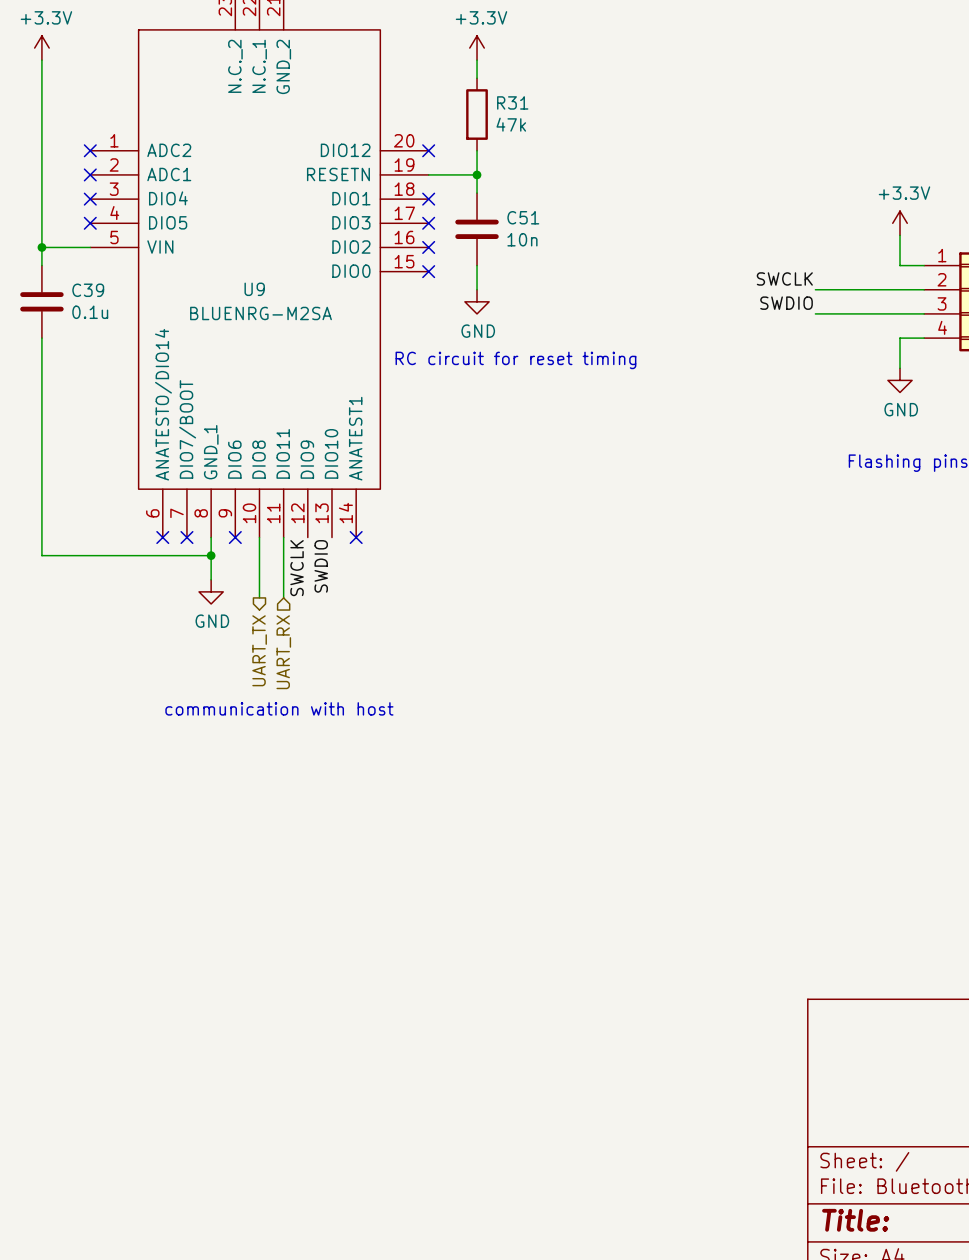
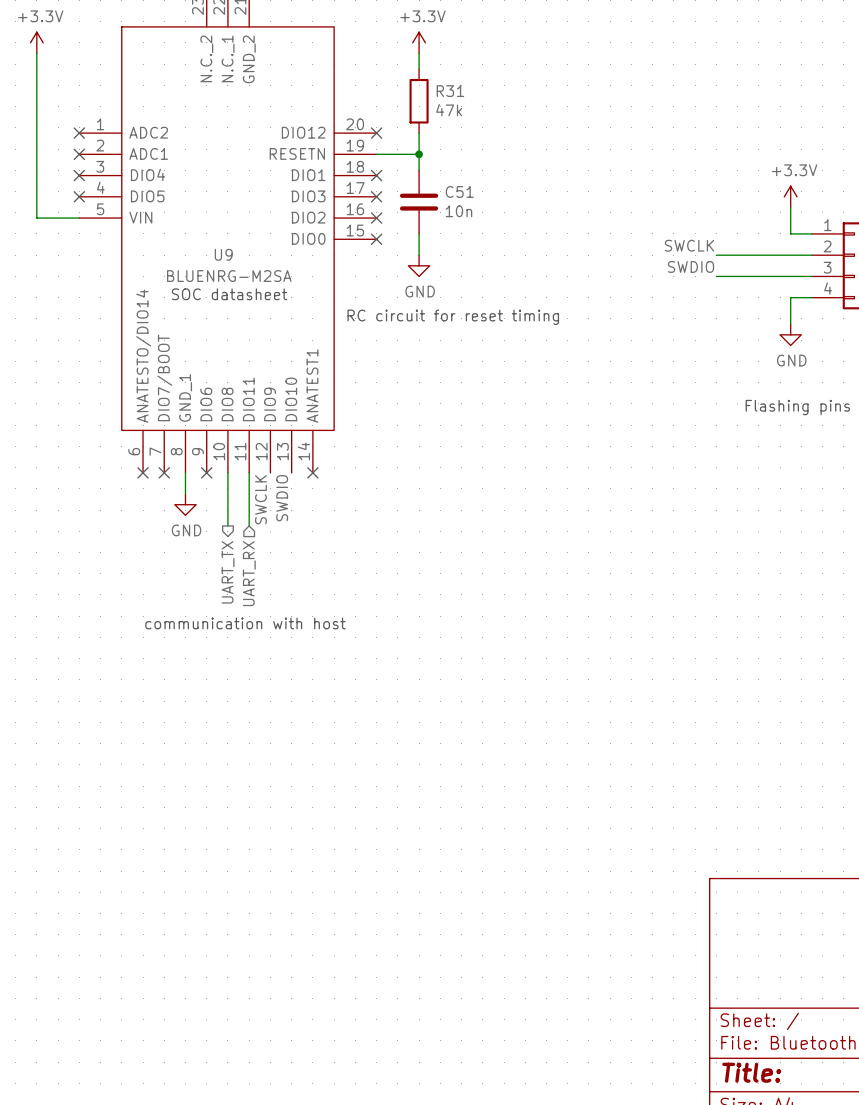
wire: (41, 247) (41, 265) -> none
junction: (41, 247) -> none
C39: 0.1u (41, 301) -> none
text: none -> SOC datasheet (229, 294)
wire: (41, 338) (41, 555) (211, 555) -> none
junction: (211, 555) -> none
power symbol position: GND (211, 591) -> GND (185, 504)

